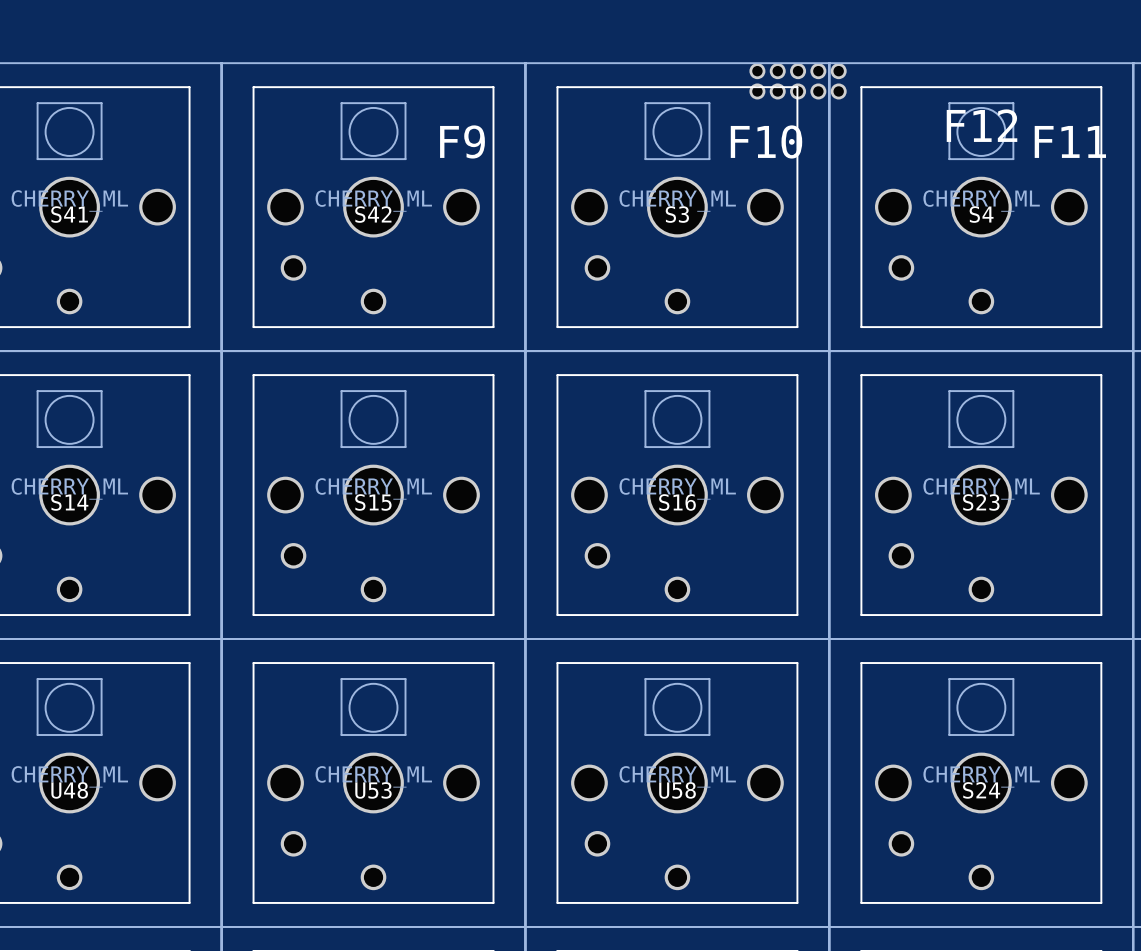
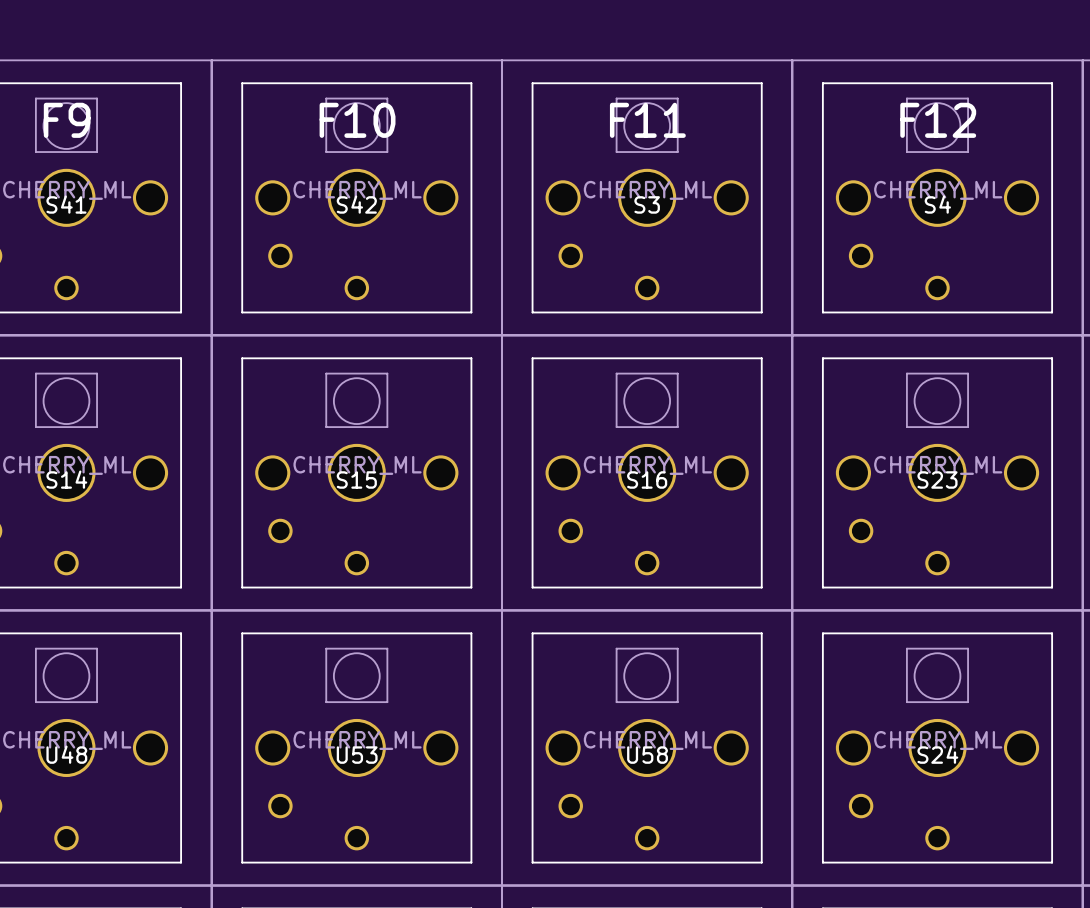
part: (798, 81) -> none
text position: F9 (462, 141) -> F9 (67, 120)
text position: F10 (766, 141) -> F10 (357, 120)
text position: F11 (1070, 141) -> F11 (647, 120)

